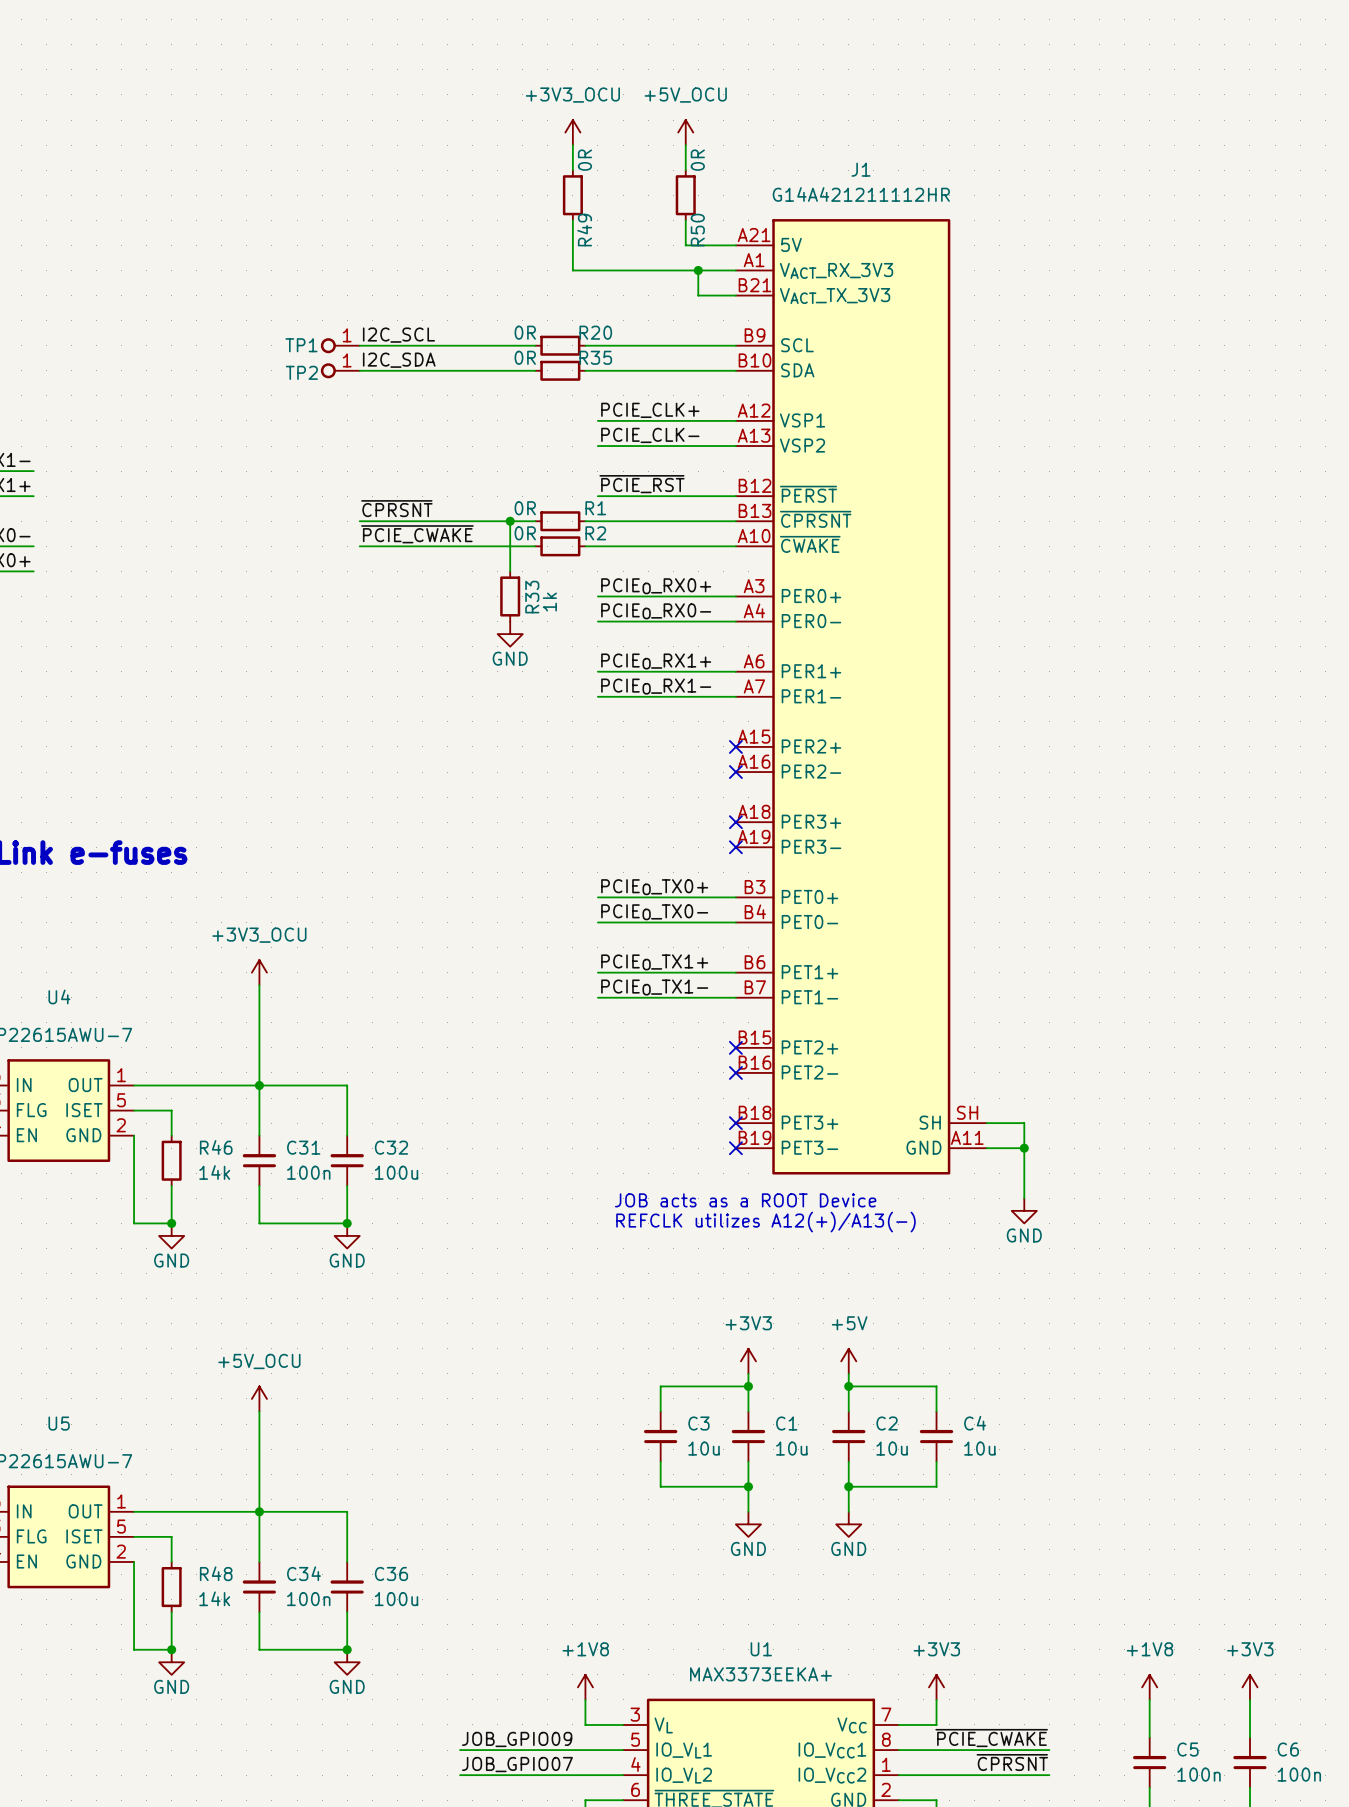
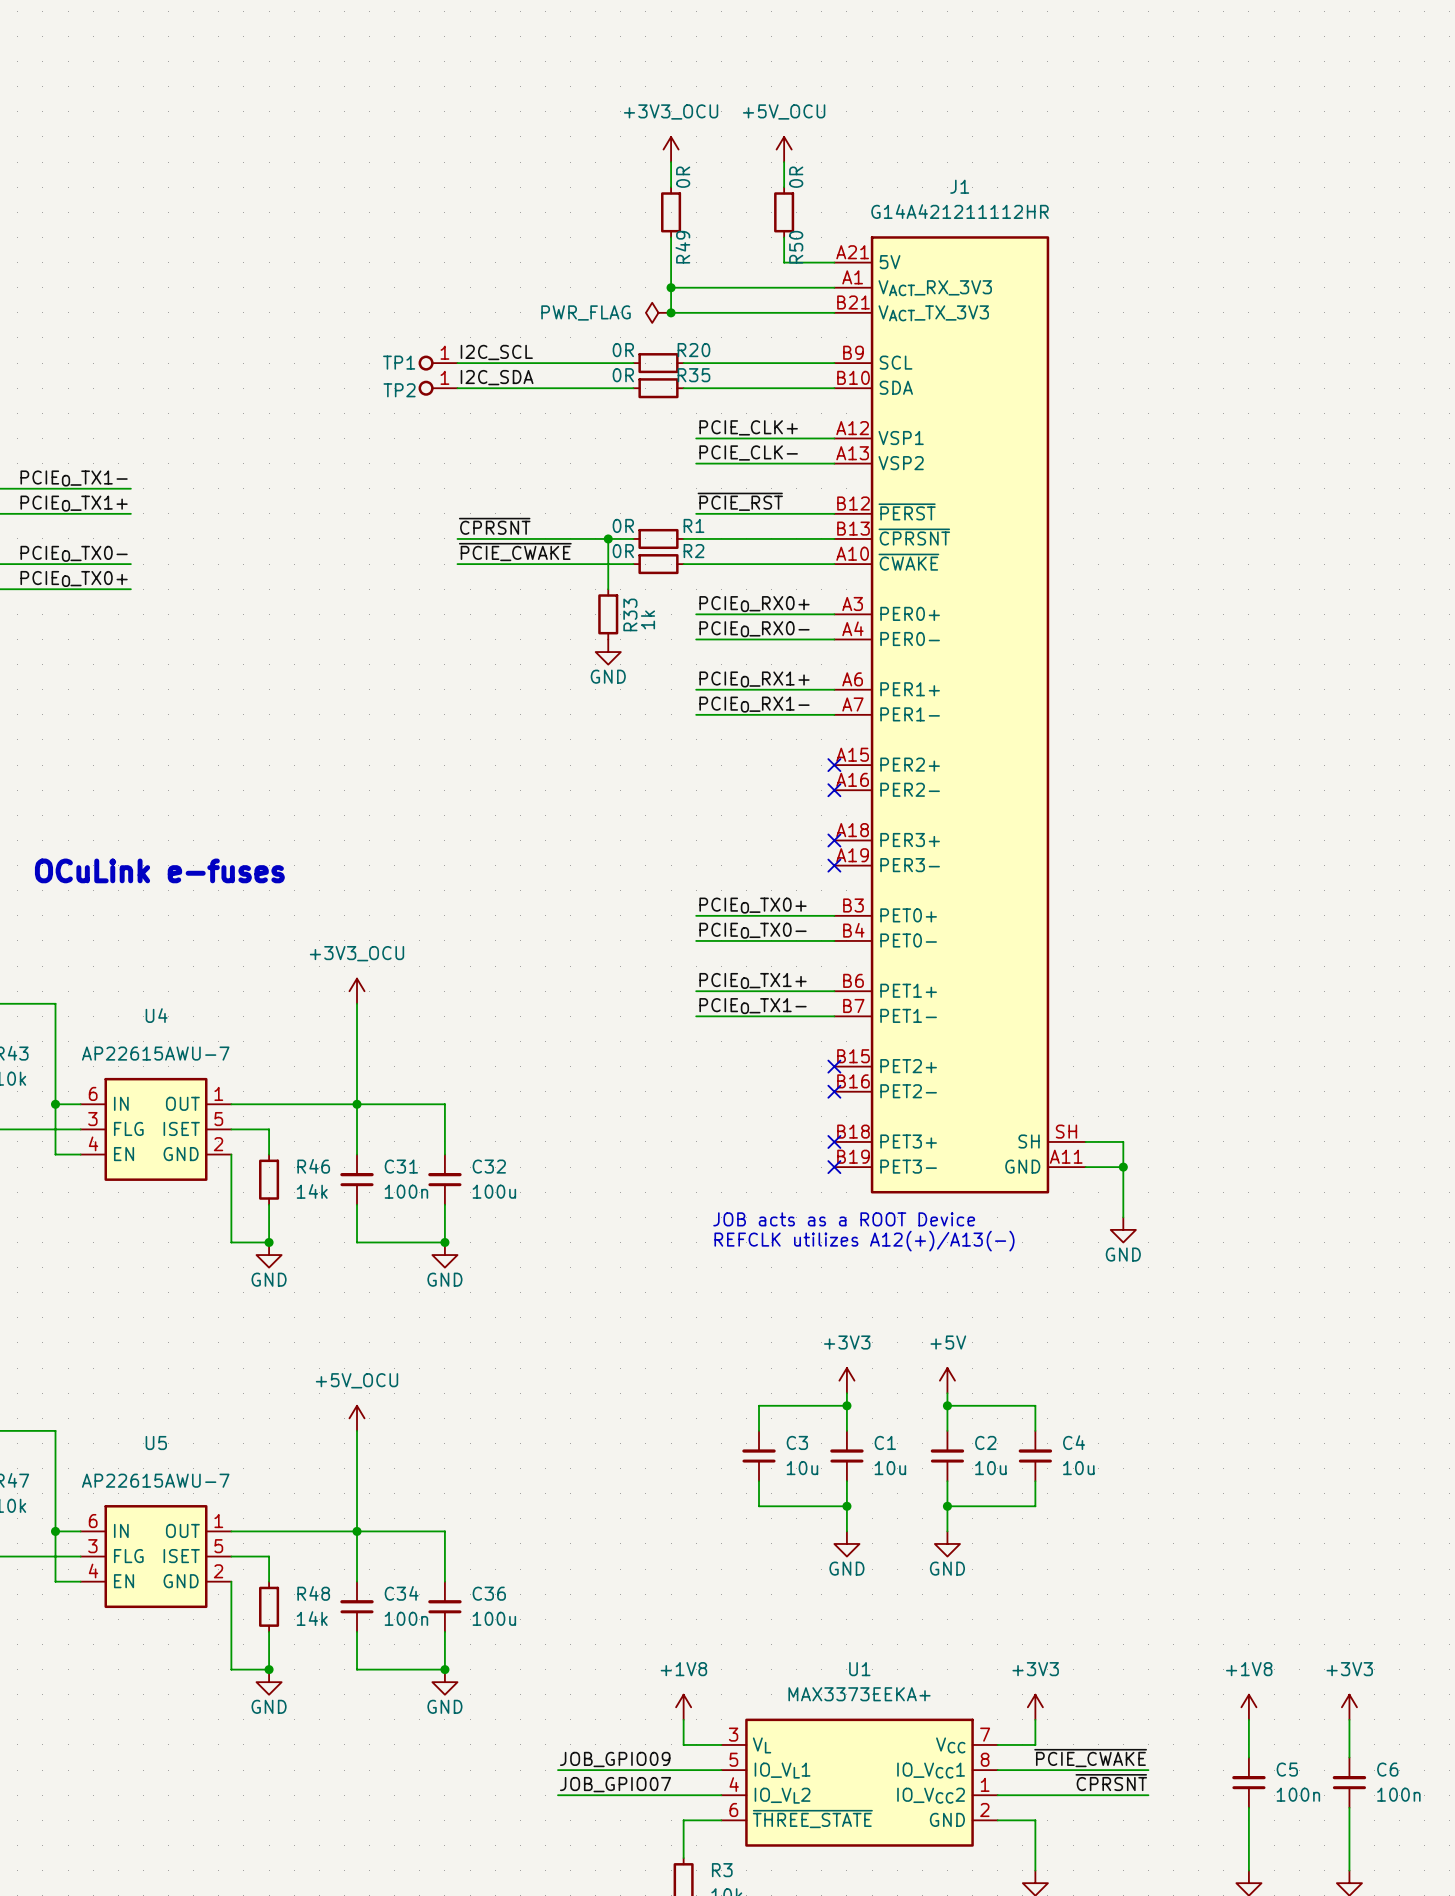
junction: none -> (671, 287)
wire: (698, 270) (698, 295) -> (671, 287) (671, 312) (796, 312)
junction: (698, 270) -> none
power symbol: none -> PWR_FLAG (658, 312)
junction: none -> (671, 312)

